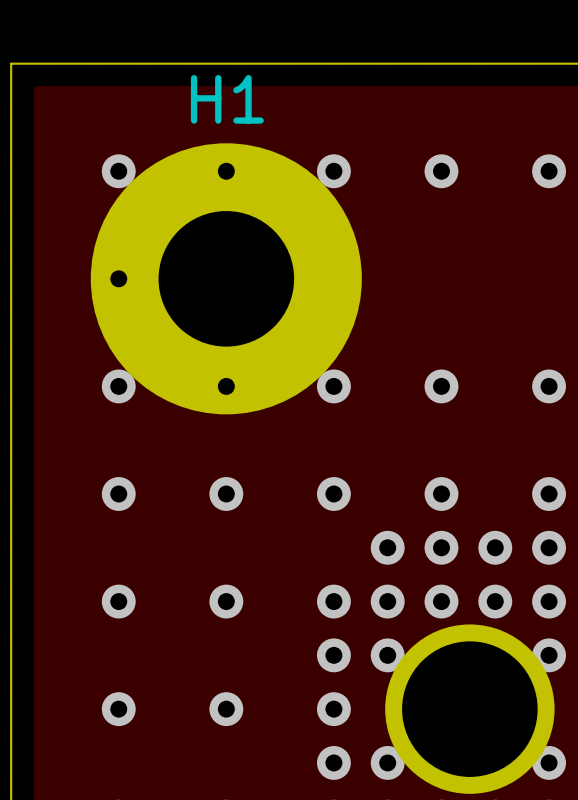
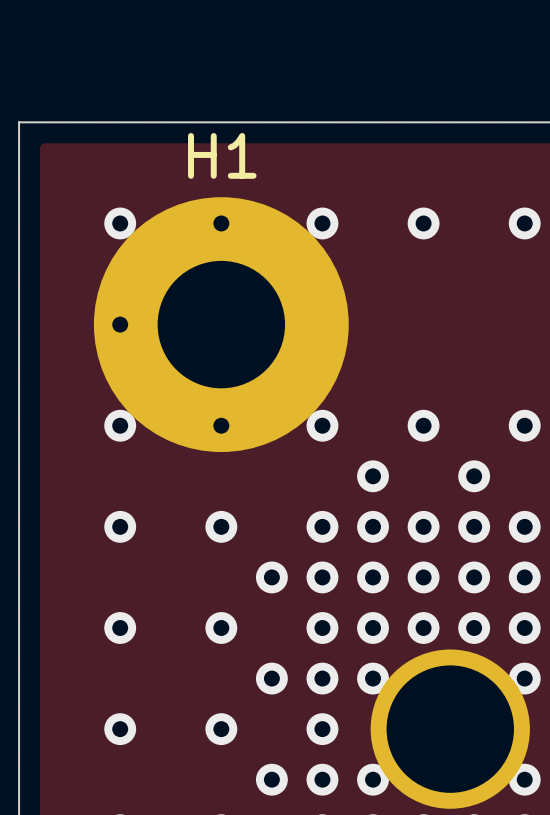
via: none -> (373, 476)
via: none -> (474, 476)
via: none -> (373, 526)
via: none -> (474, 526)
via: none -> (271, 577)
via: none -> (322, 577)
via: none -> (271, 678)
via: none -> (271, 779)

